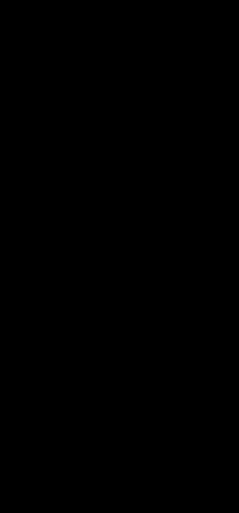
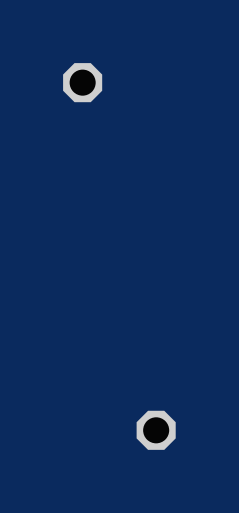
part: none -> (82, 82)
part: none -> (156, 430)

